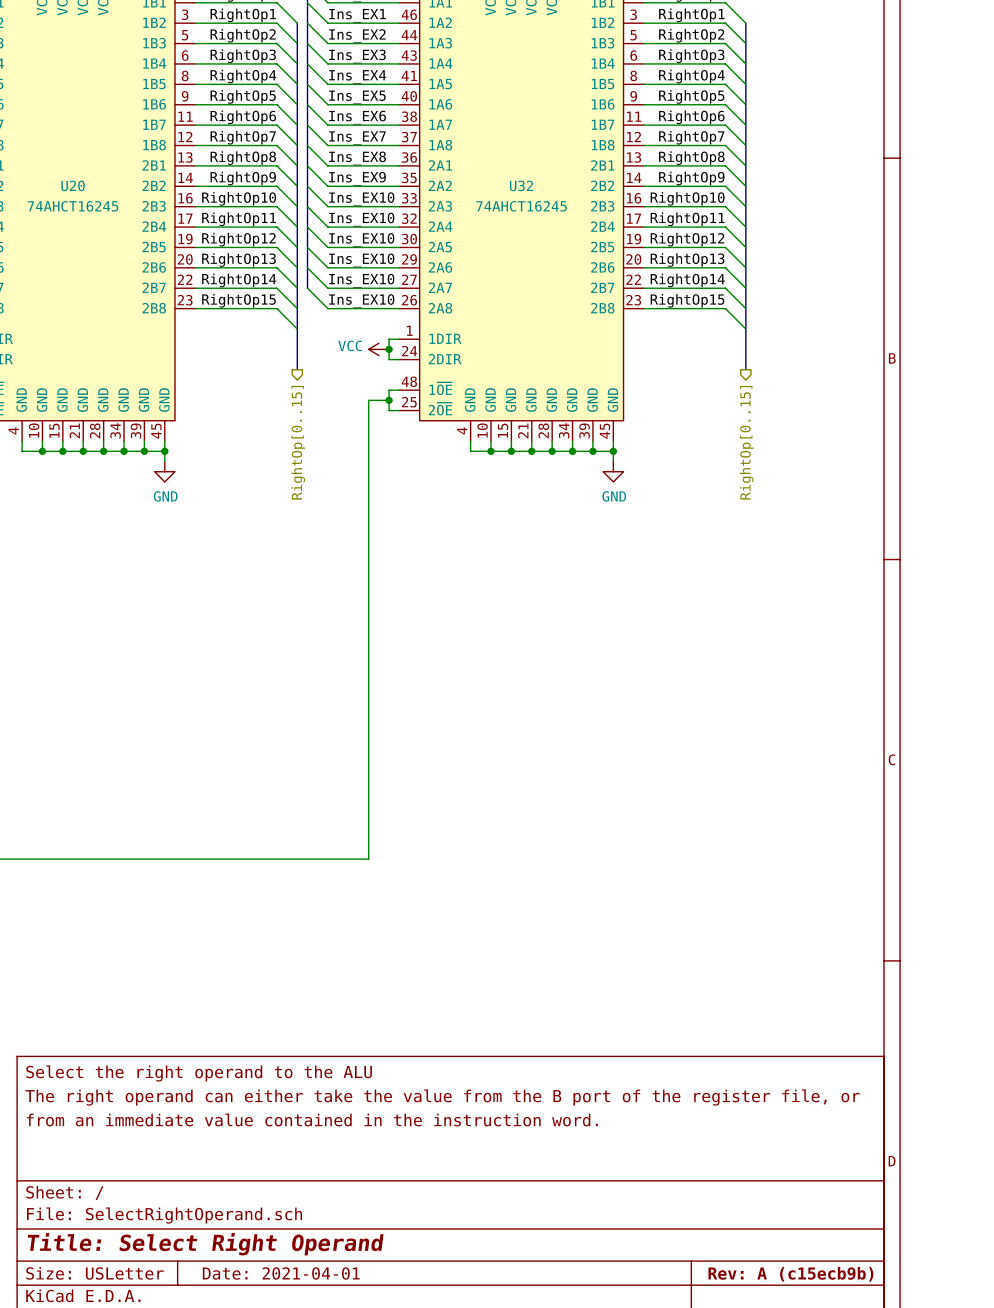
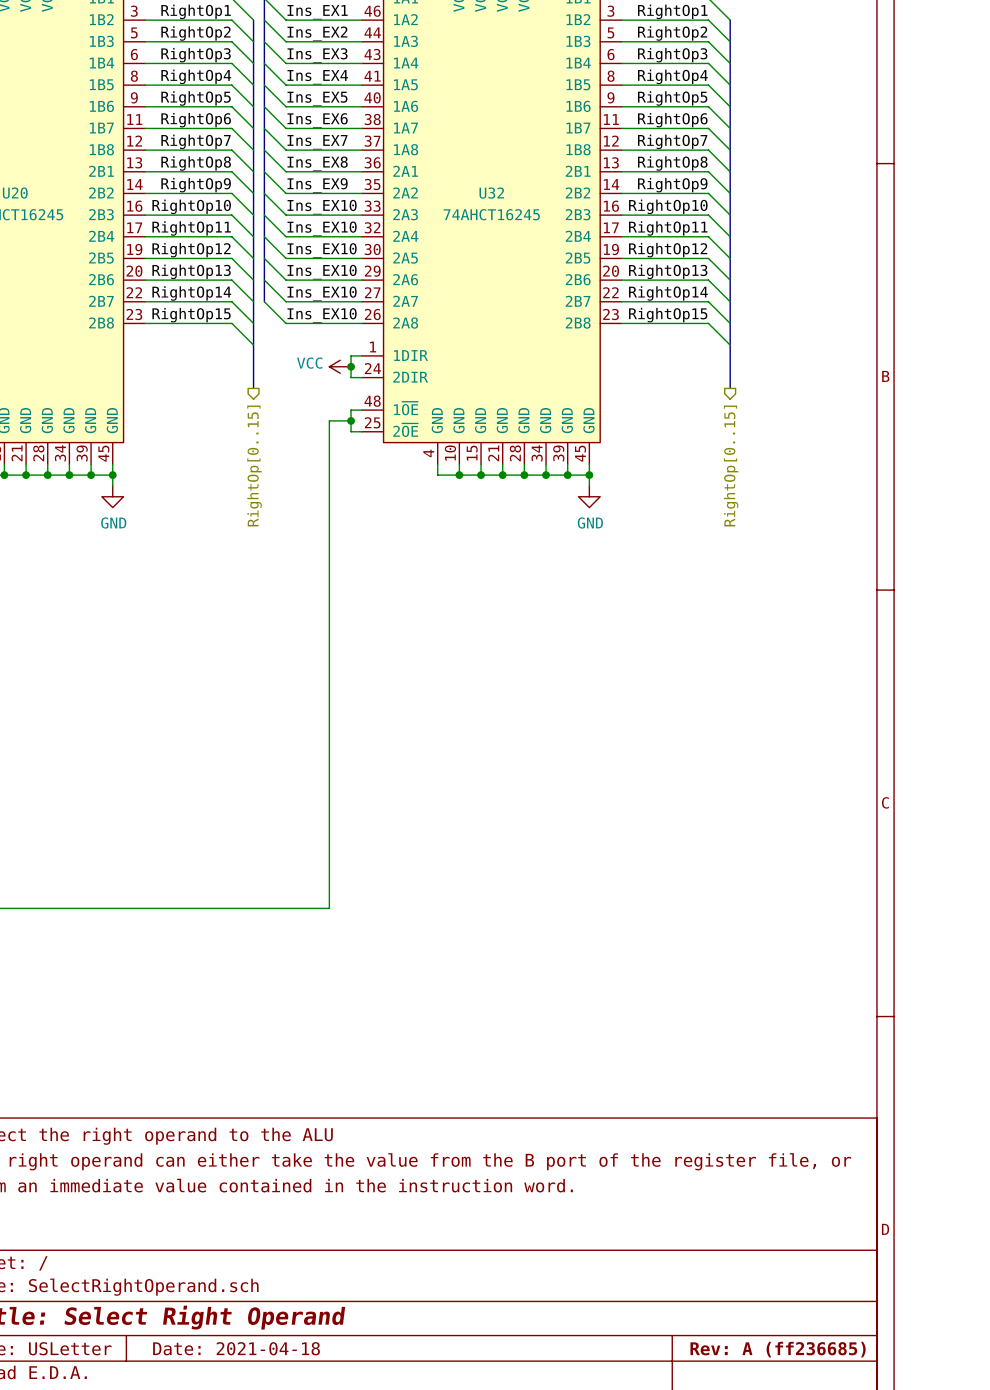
title block: Date: 2021-04-01 (281, 1273) -> Date: 2021-04-18 (236, 1348)
title block: Rev: A (c15ecb9b) (790, 1274) -> Rev: A (ff236685) (778, 1349)

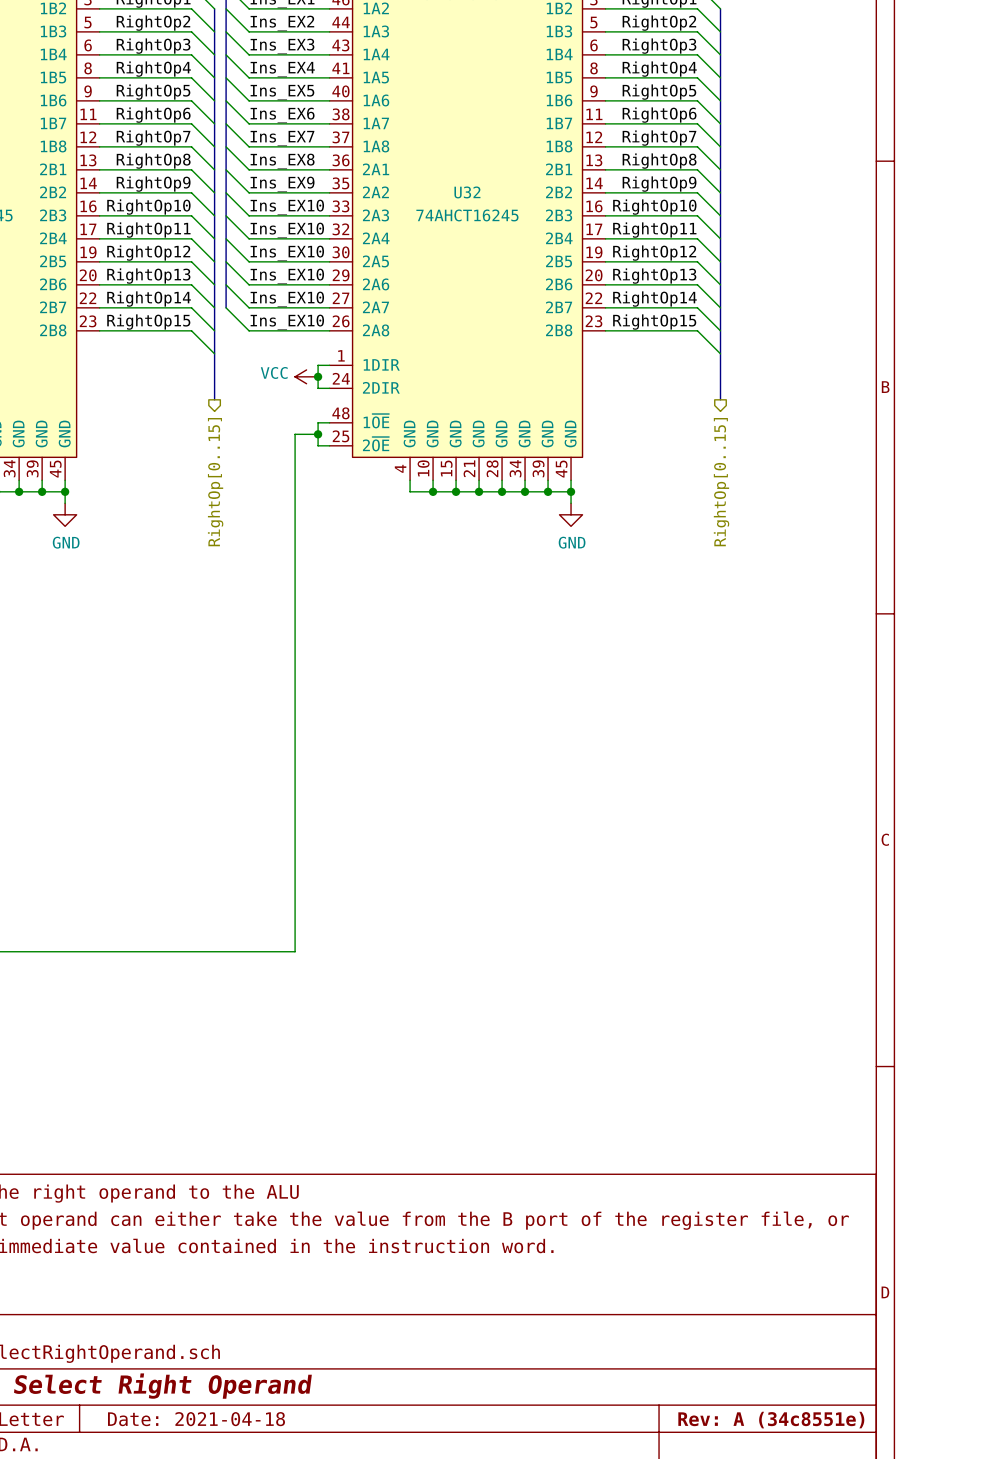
title block: Rev: A (ff236685) (778, 1349) -> Rev: A (34c8551e) (771, 1420)

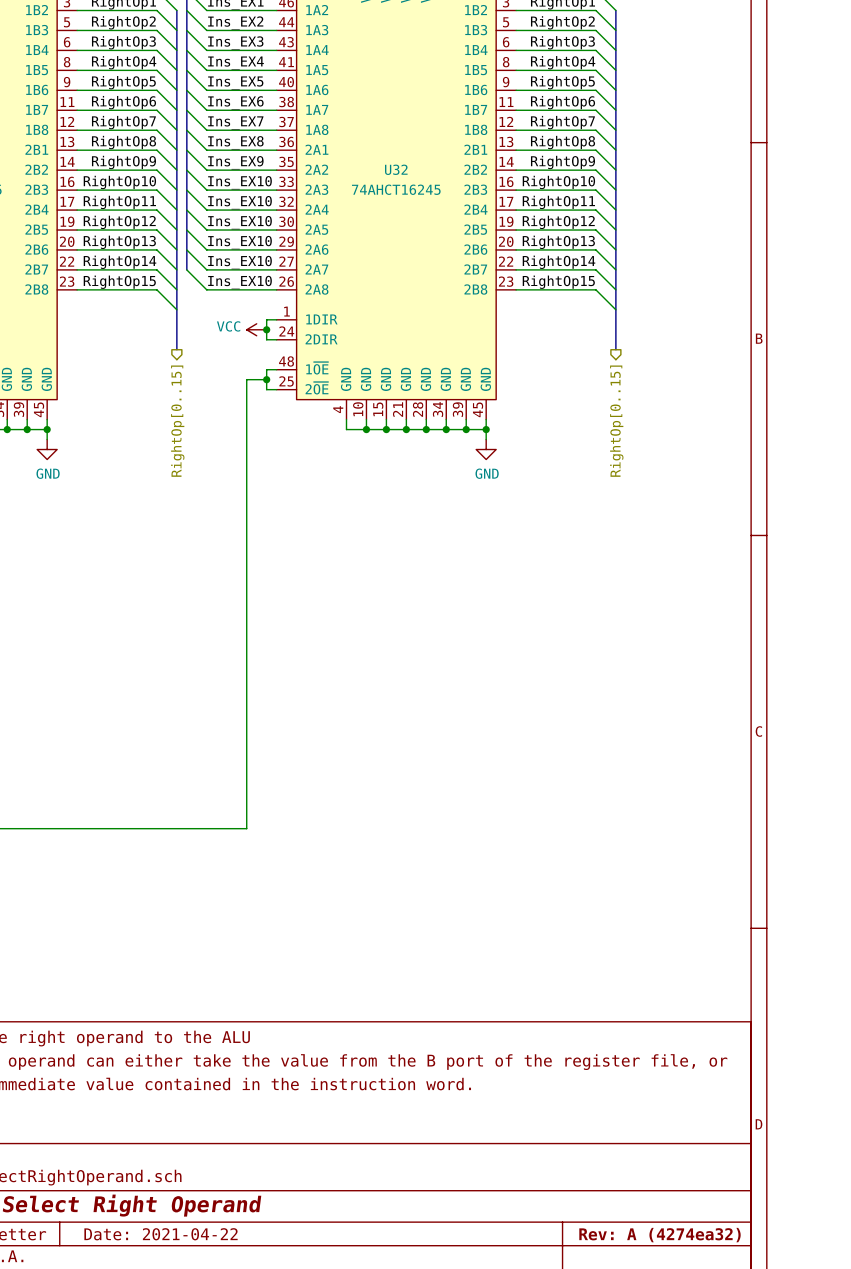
title block: Date: 2021-04-18 (196, 1419) -> Date: 2021-04-22 (161, 1234)
title block: Rev: A (34c8551e) (771, 1420) -> Rev: A (4274ea32) (659, 1235)

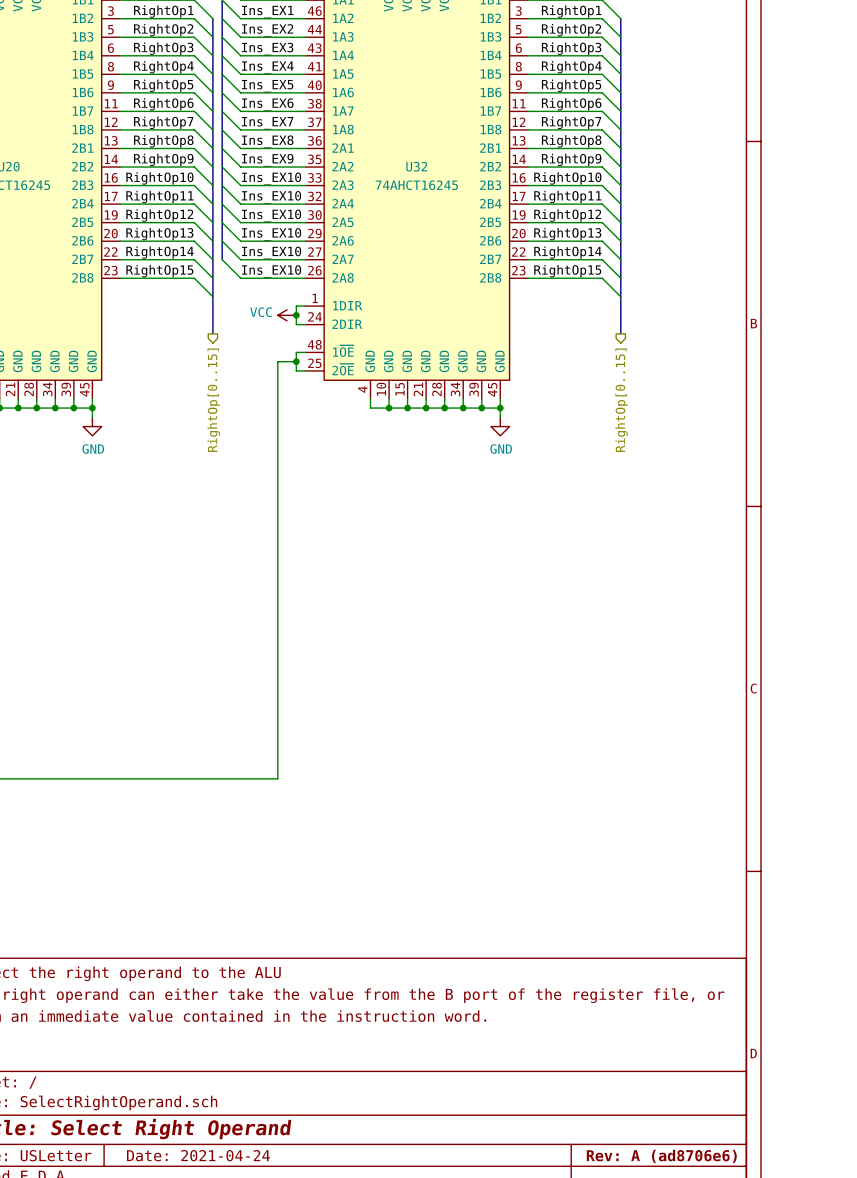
title block: Date: 2021-04-22 (161, 1234) -> Date: 2021-04-24 (198, 1155)
title block: Rev: A (4274ea32) (659, 1235) -> Rev: A (ad8706e6) (661, 1156)

